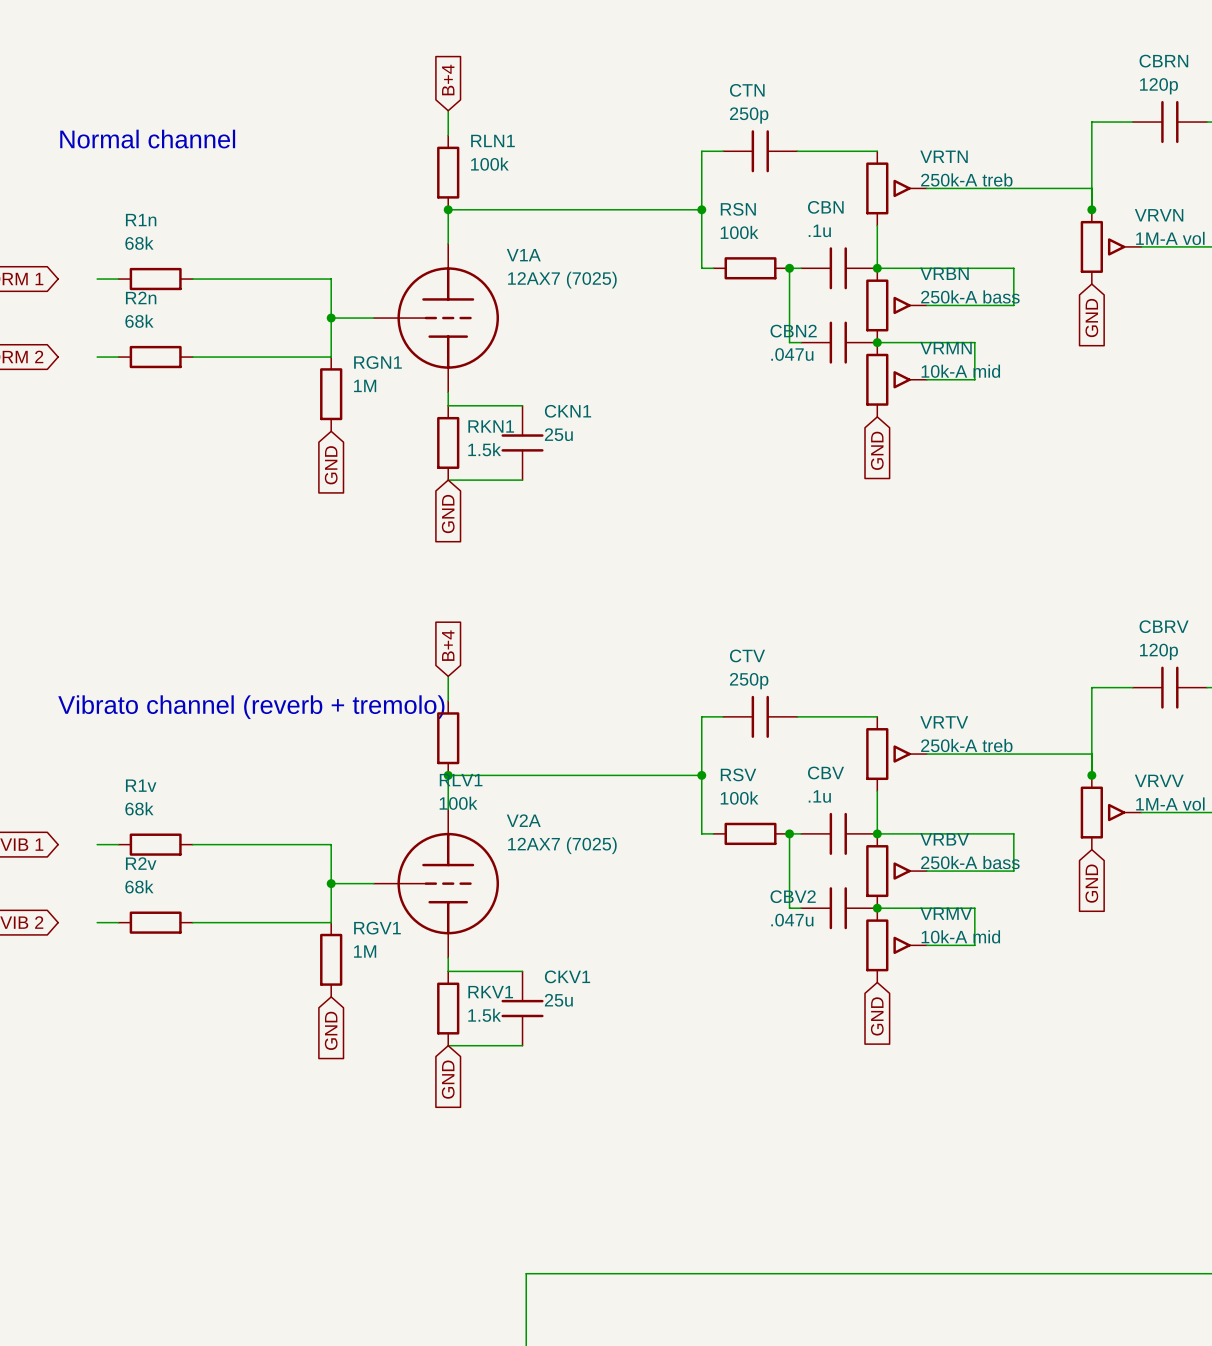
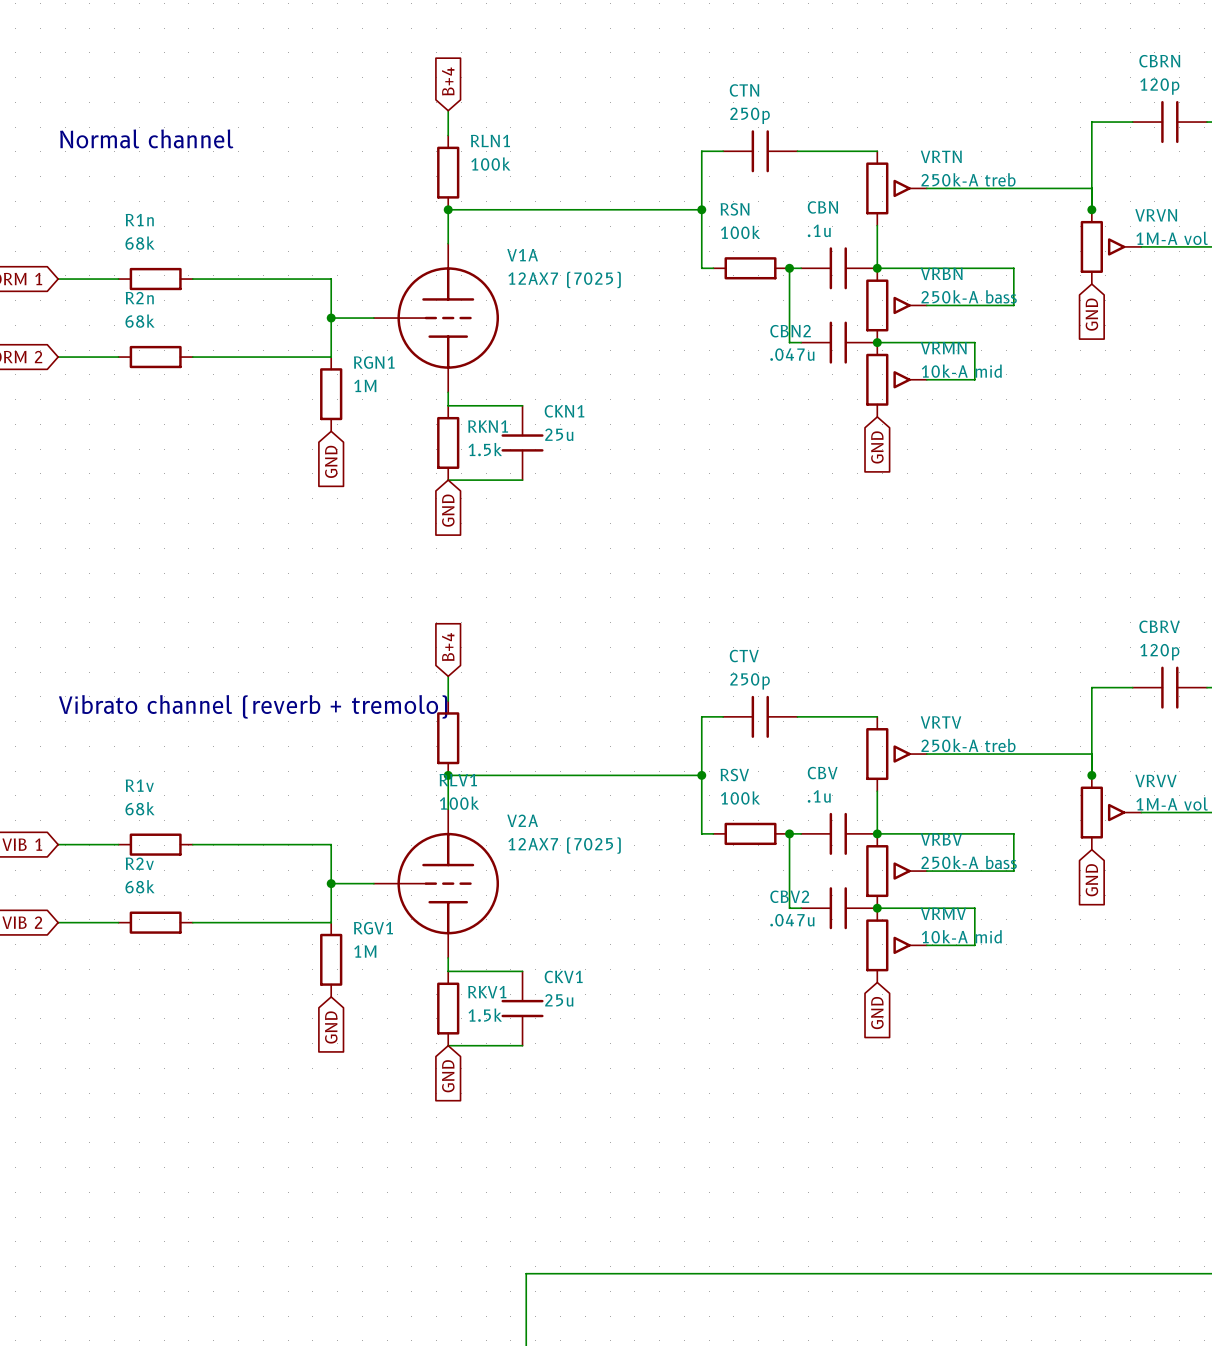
wire: none -> (58, 279) (97, 279)
wire: none -> (58, 357) (97, 357)
wire: none -> (58, 844) (97, 844)
wire: none -> (58, 922) (97, 922)

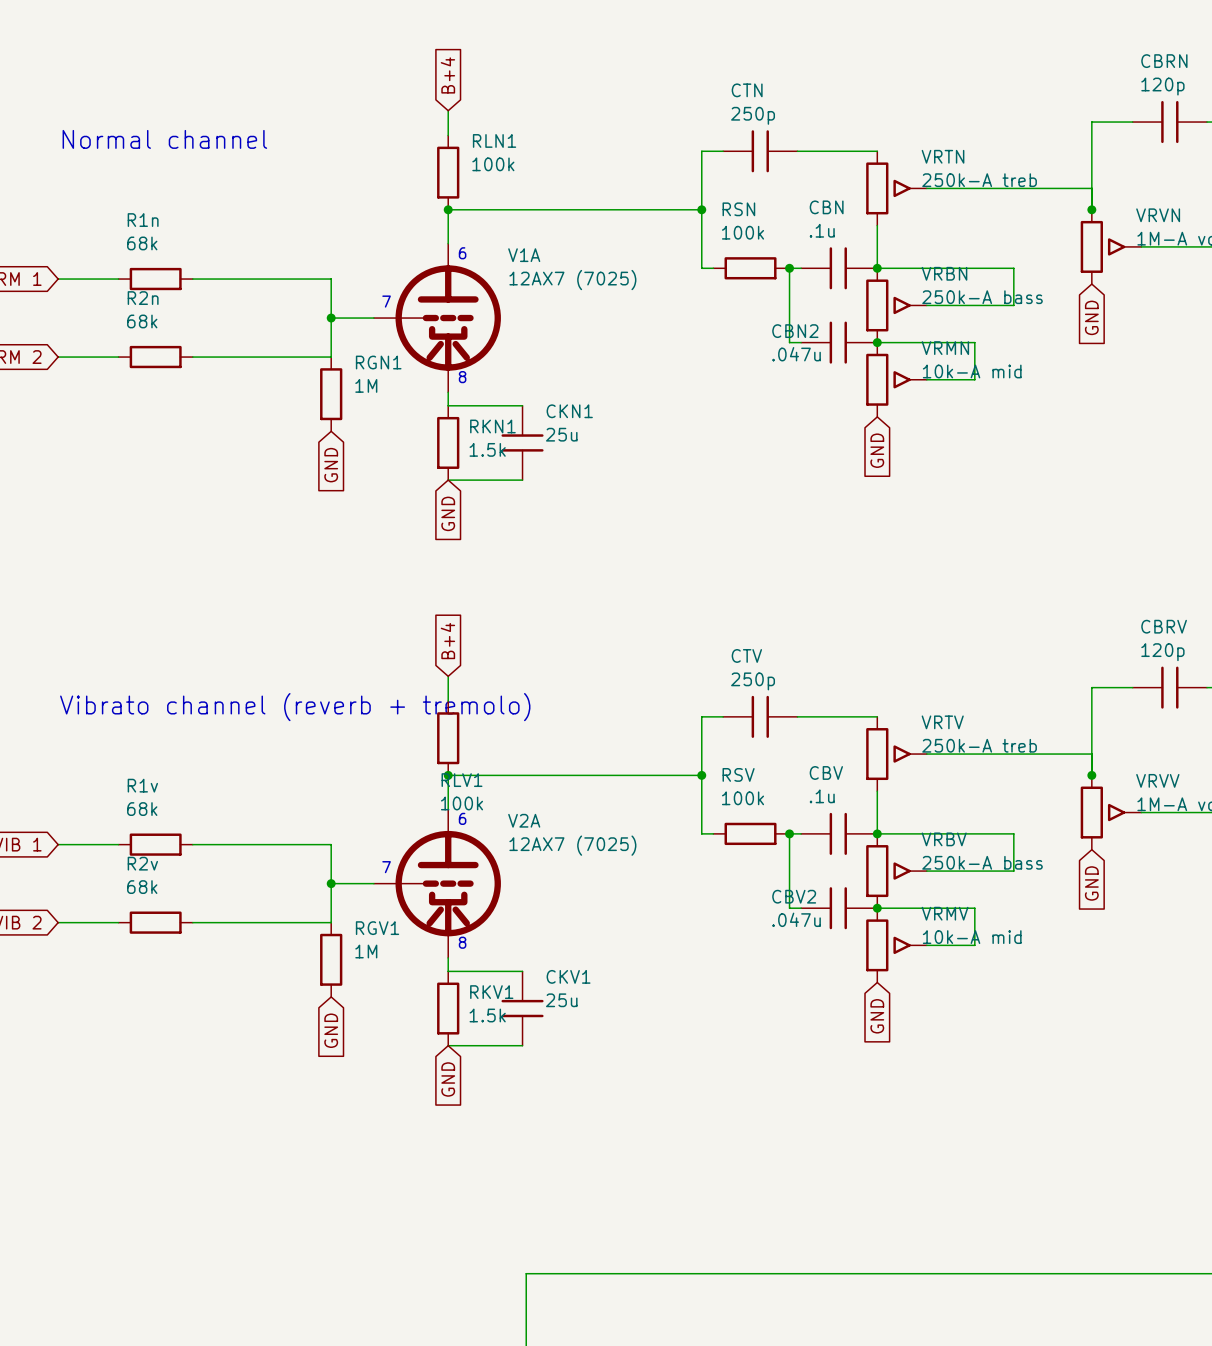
V1A symbol: [373, 243, 500, 393] -> [373, 243, 501, 393]
text: none -> 6 (462, 253)
text: none -> 7 (386, 301)
text: none -> 8 (462, 377)
V2A symbol: [373, 809, 500, 958] -> [373, 809, 501, 958]
text: none -> 6 (462, 818)
text: none -> 7 (386, 867)
text: none -> 8 (462, 942)

